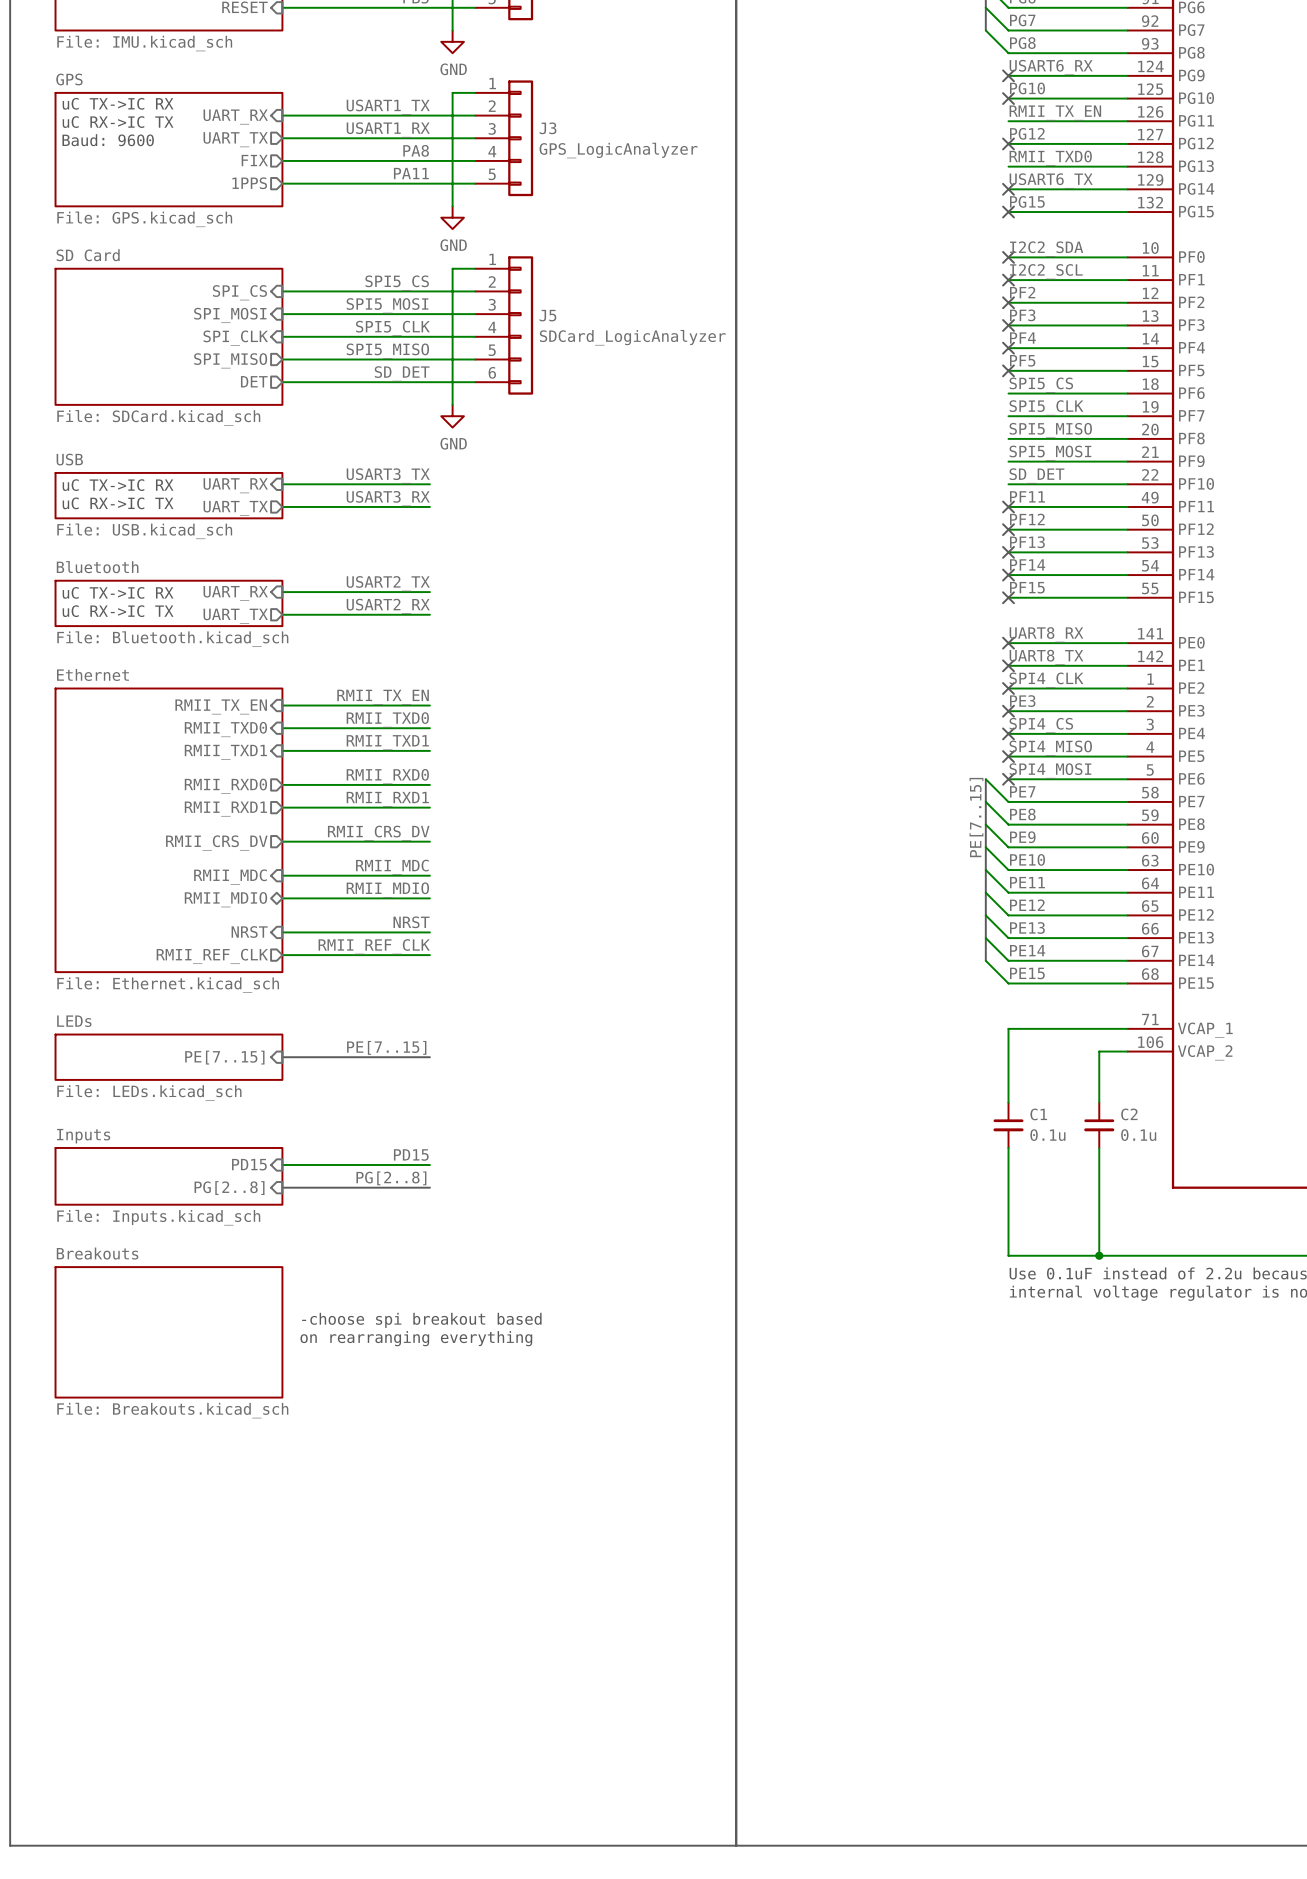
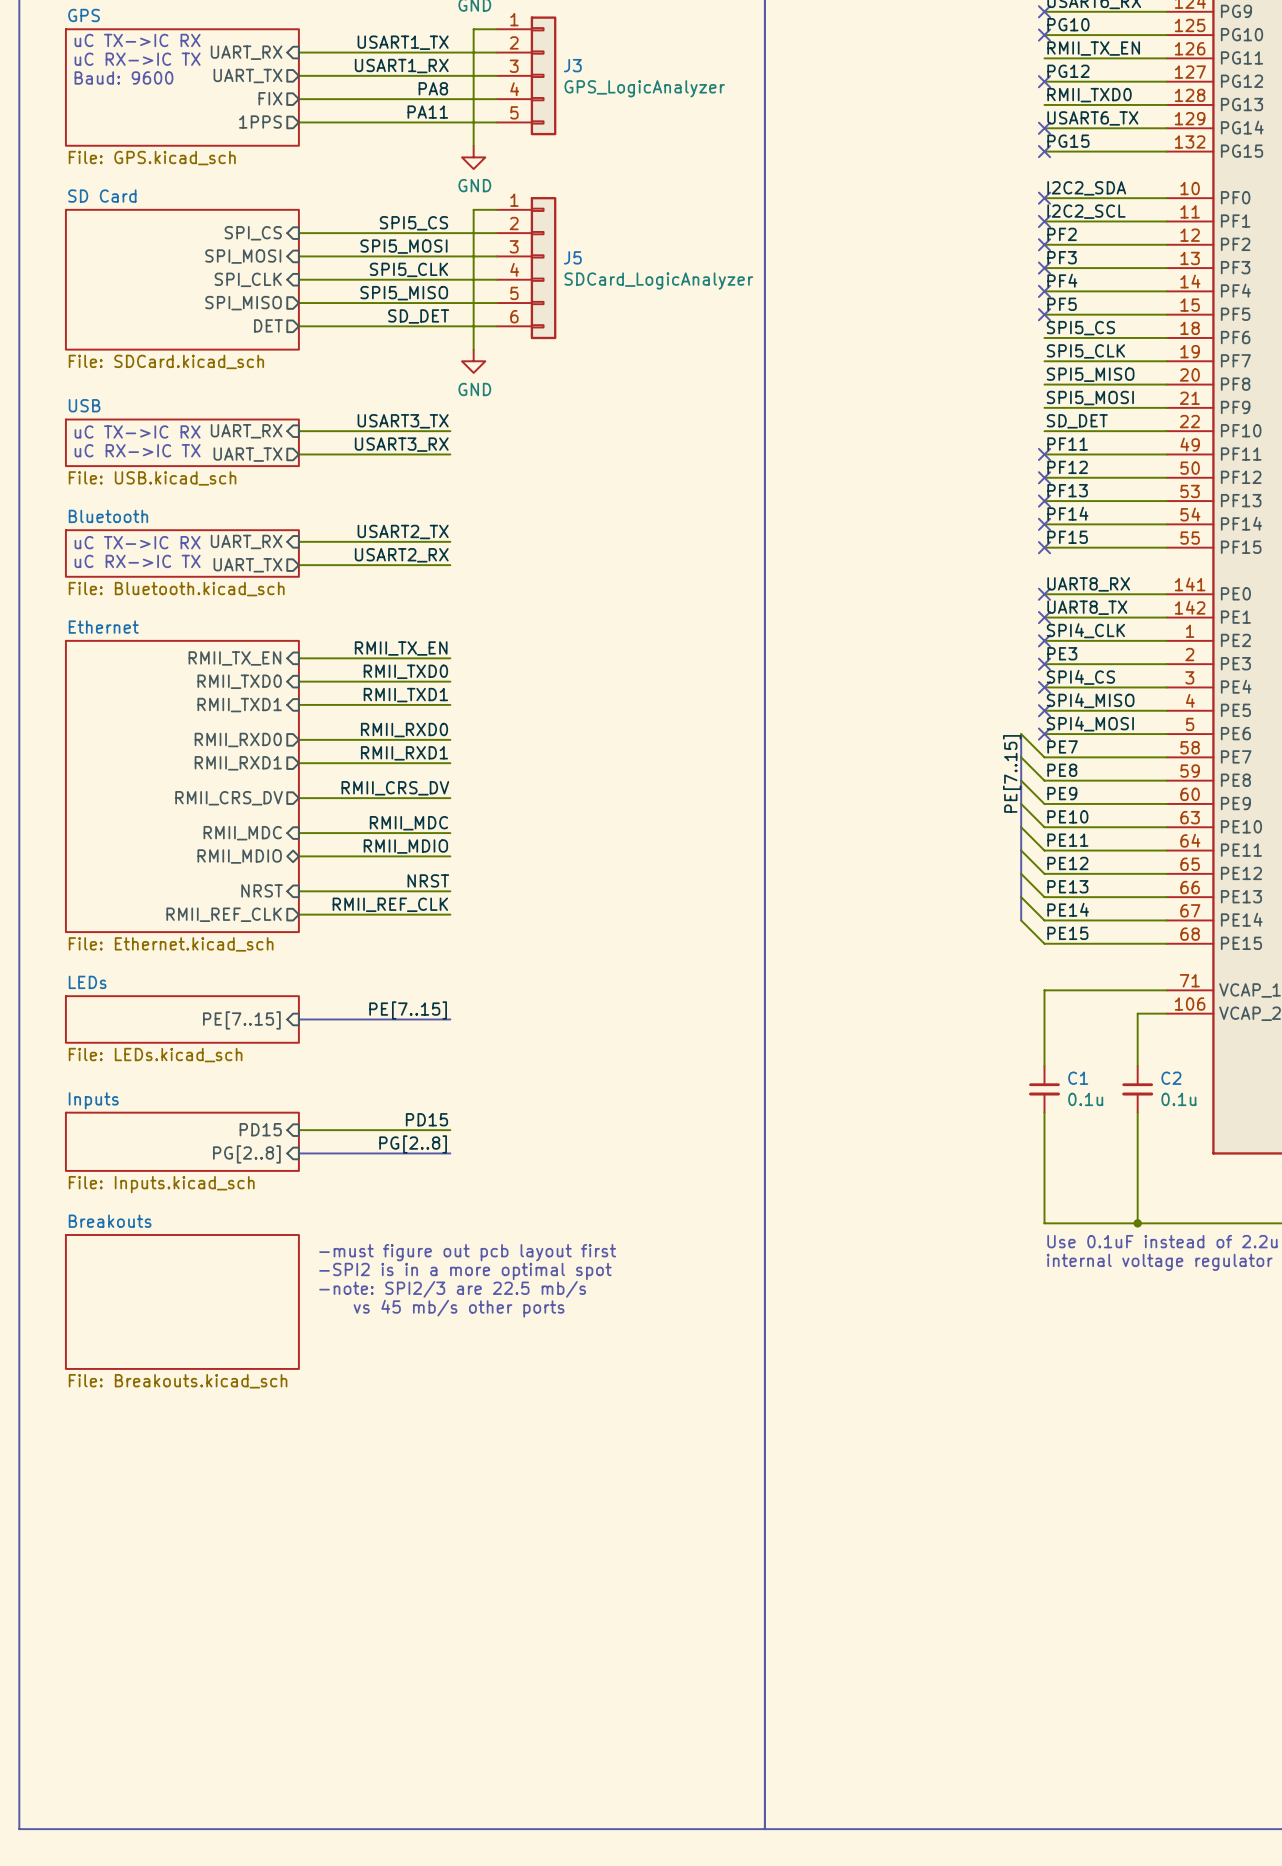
text: none -> -must figure out pcb layout first (467, 1252)
text: none -> -SPI2 is in a more optimal spot (465, 1271)
text: -choose spi breakout based (421, 1320) -> -note: SPI2/3 are 22.5 mb/s (452, 1289)
text: on rearranging everything (416, 1338) -> vs 45 mb/s other ports (459, 1308)

